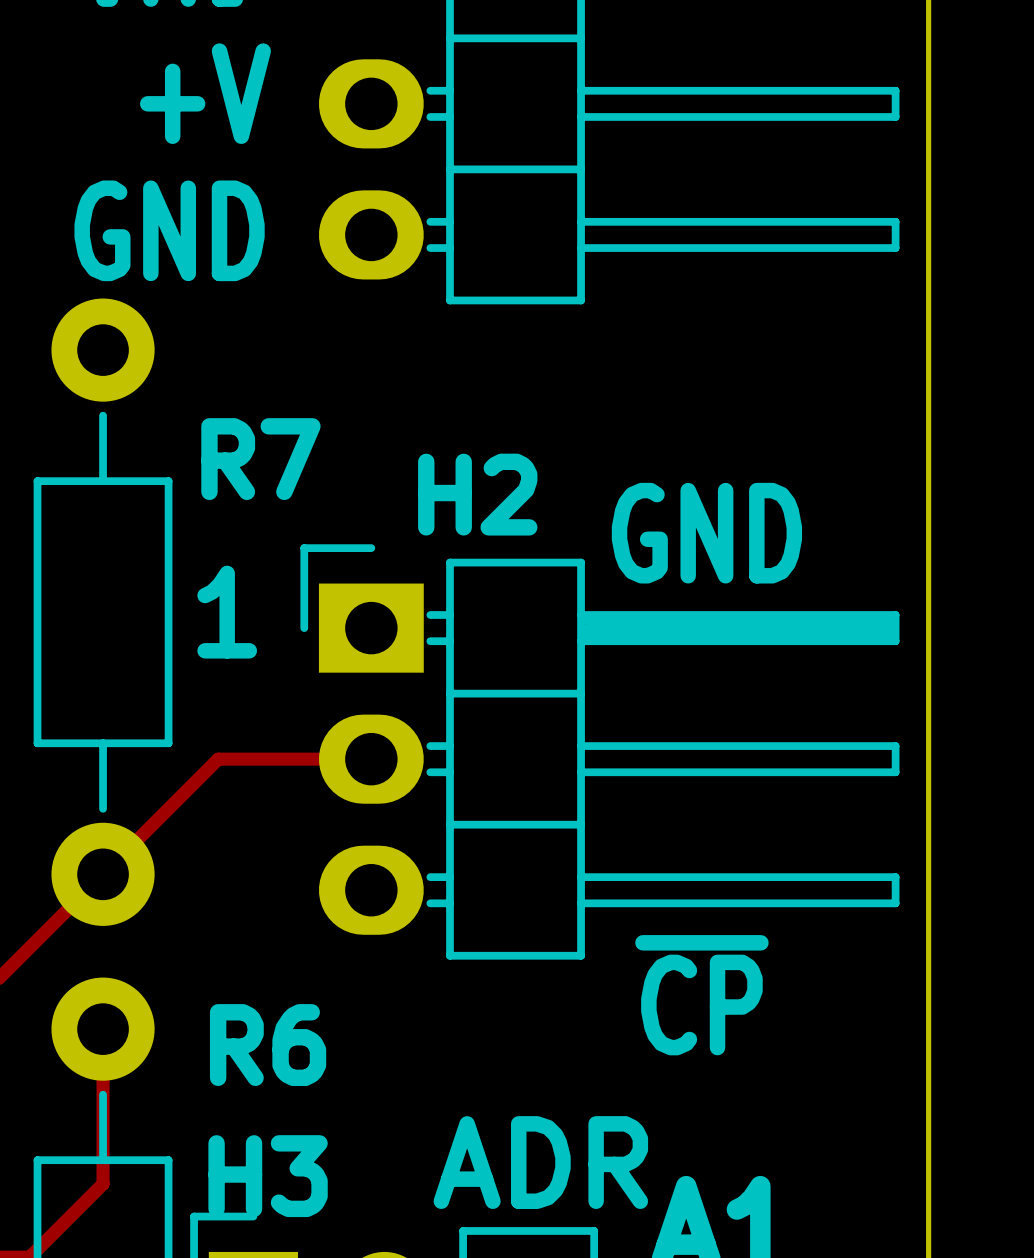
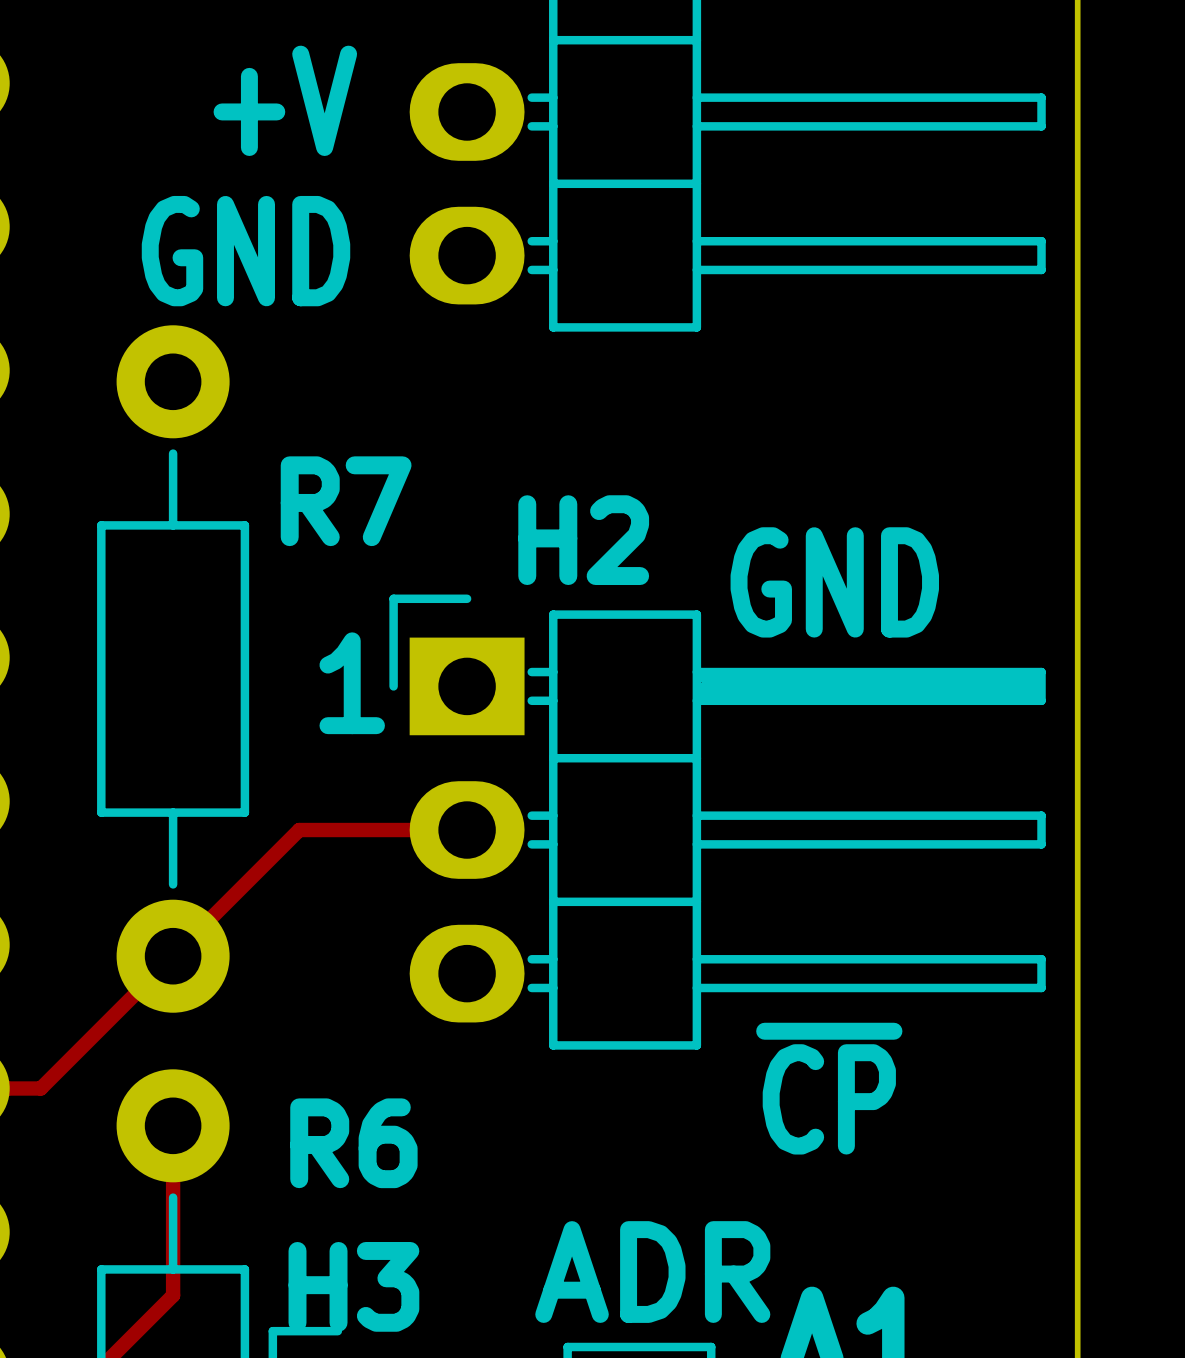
text position: 1 (227, 612) -> 1 (352, 683)

